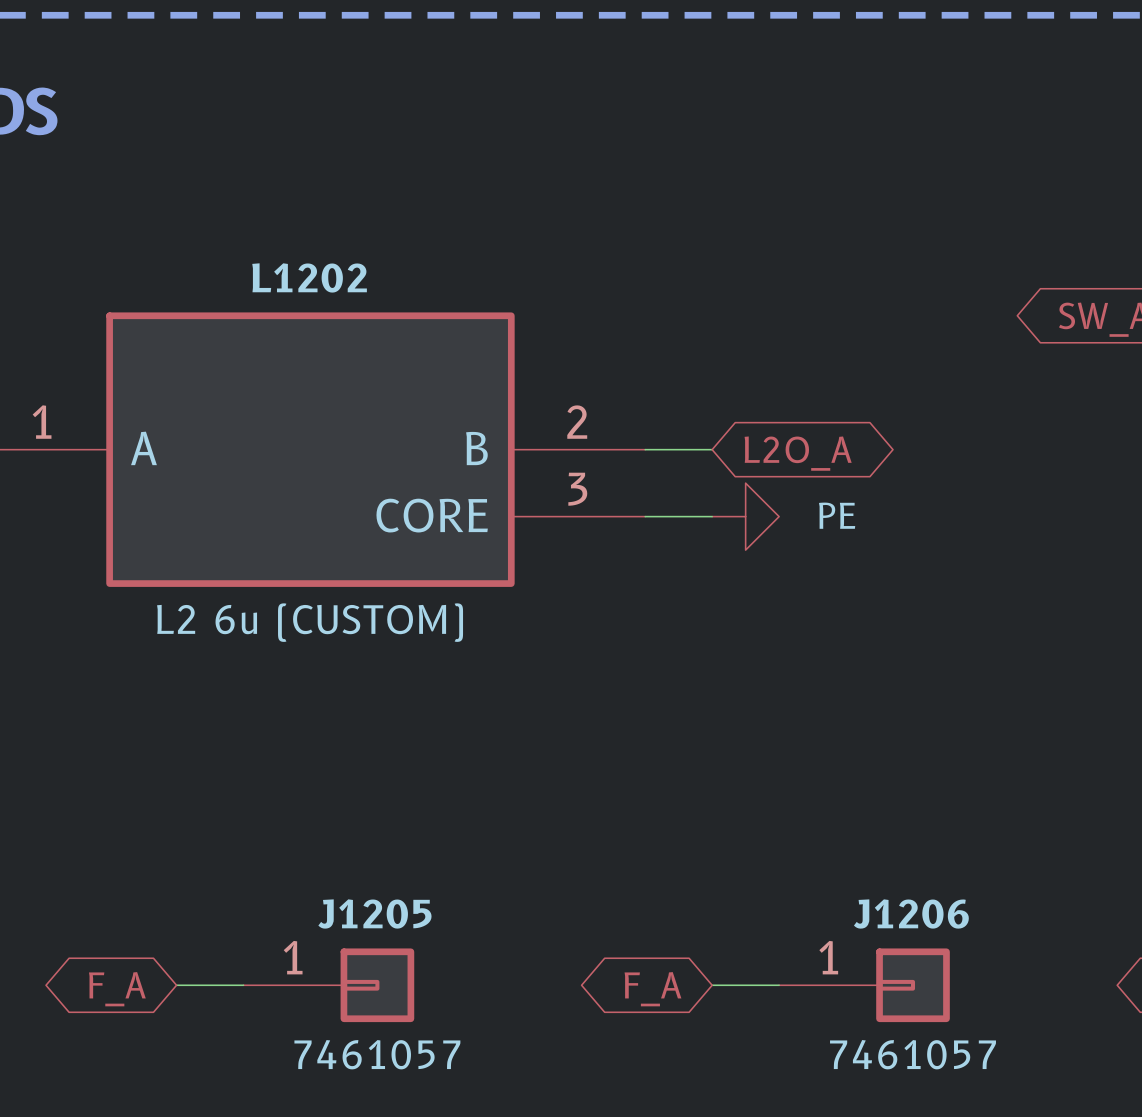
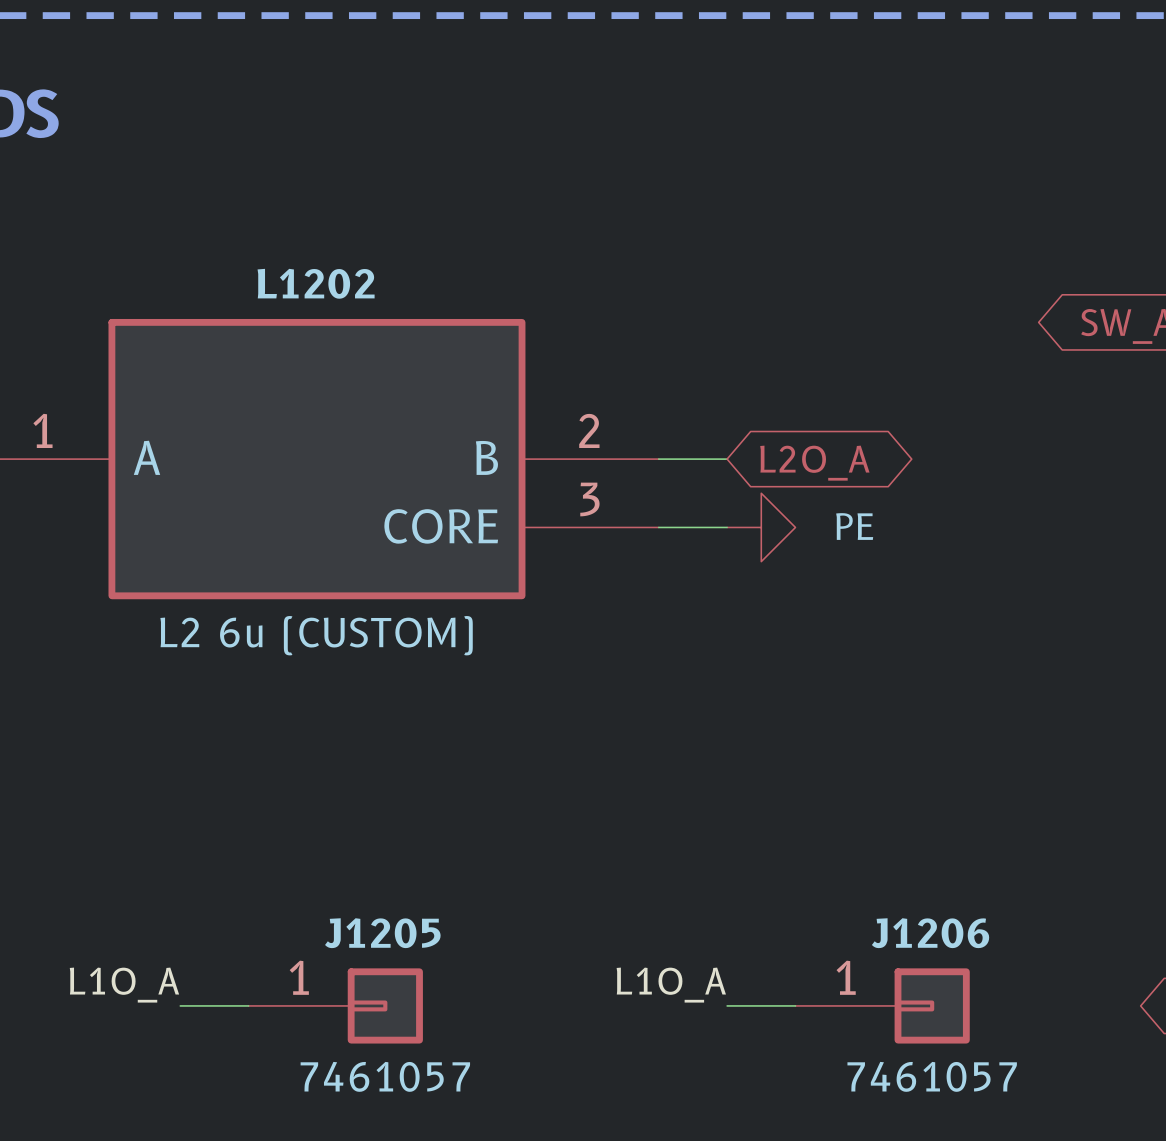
label: none -> L1O_A (124, 985)
label: none -> L1O_A (671, 985)
global label: F_A (117, 989) -> none
global label: F_A (652, 989) -> none

